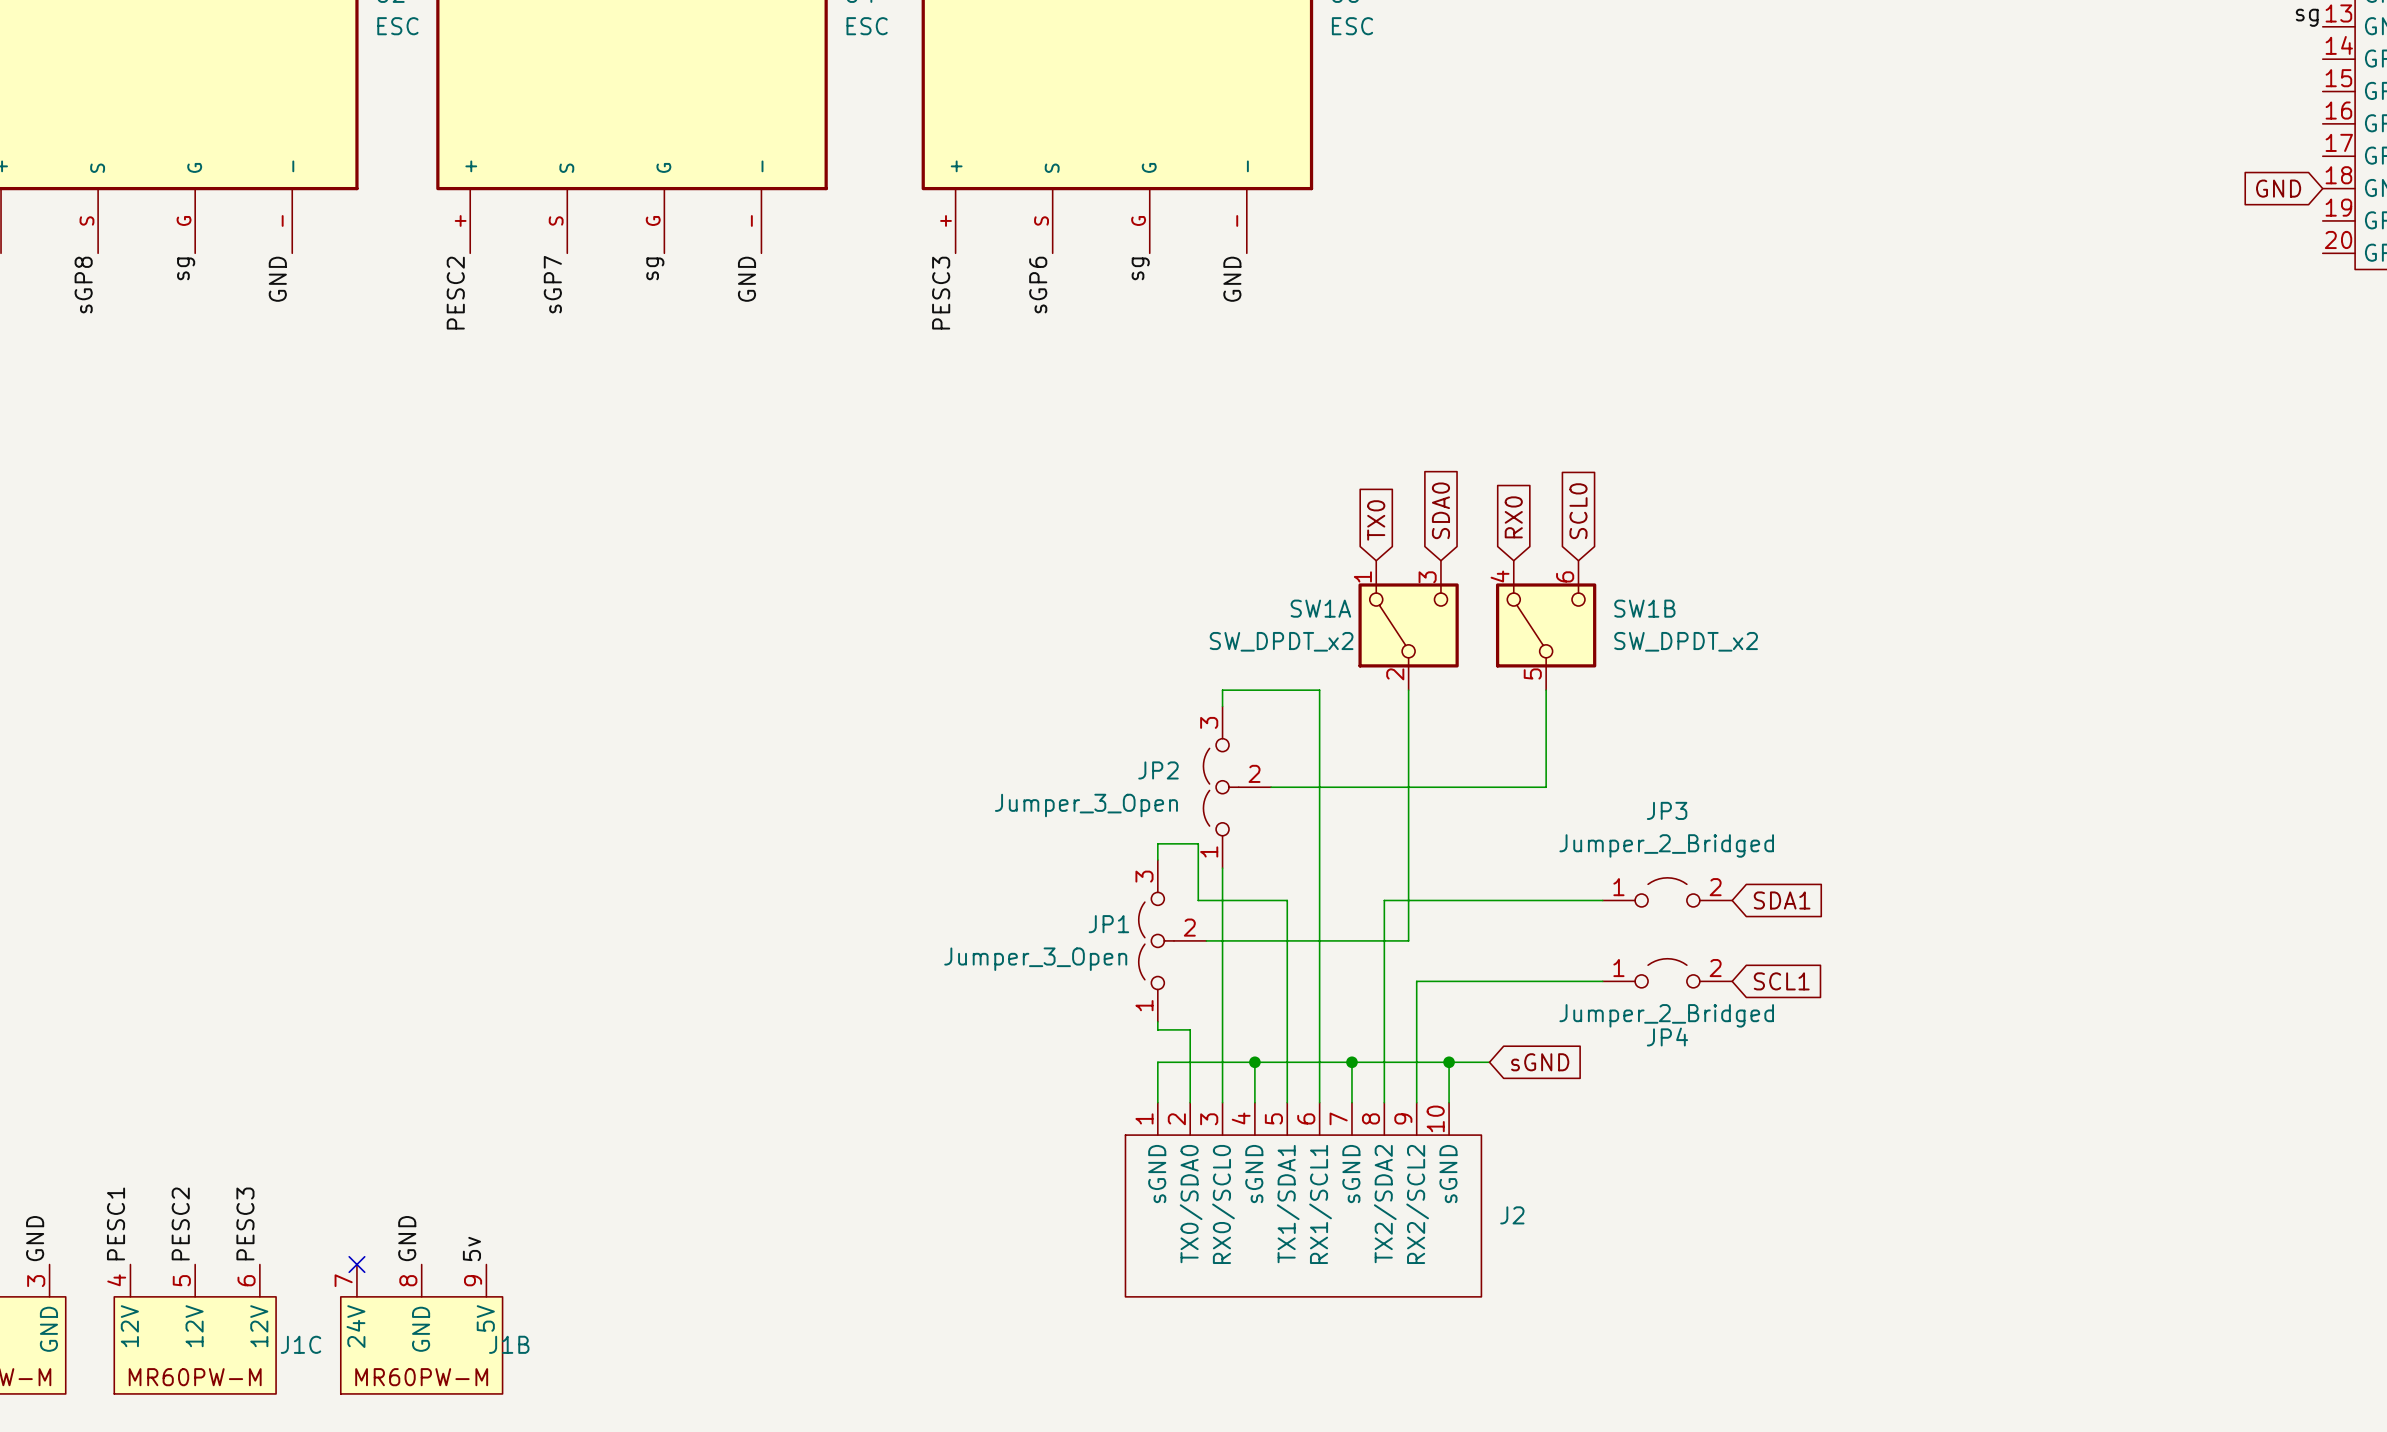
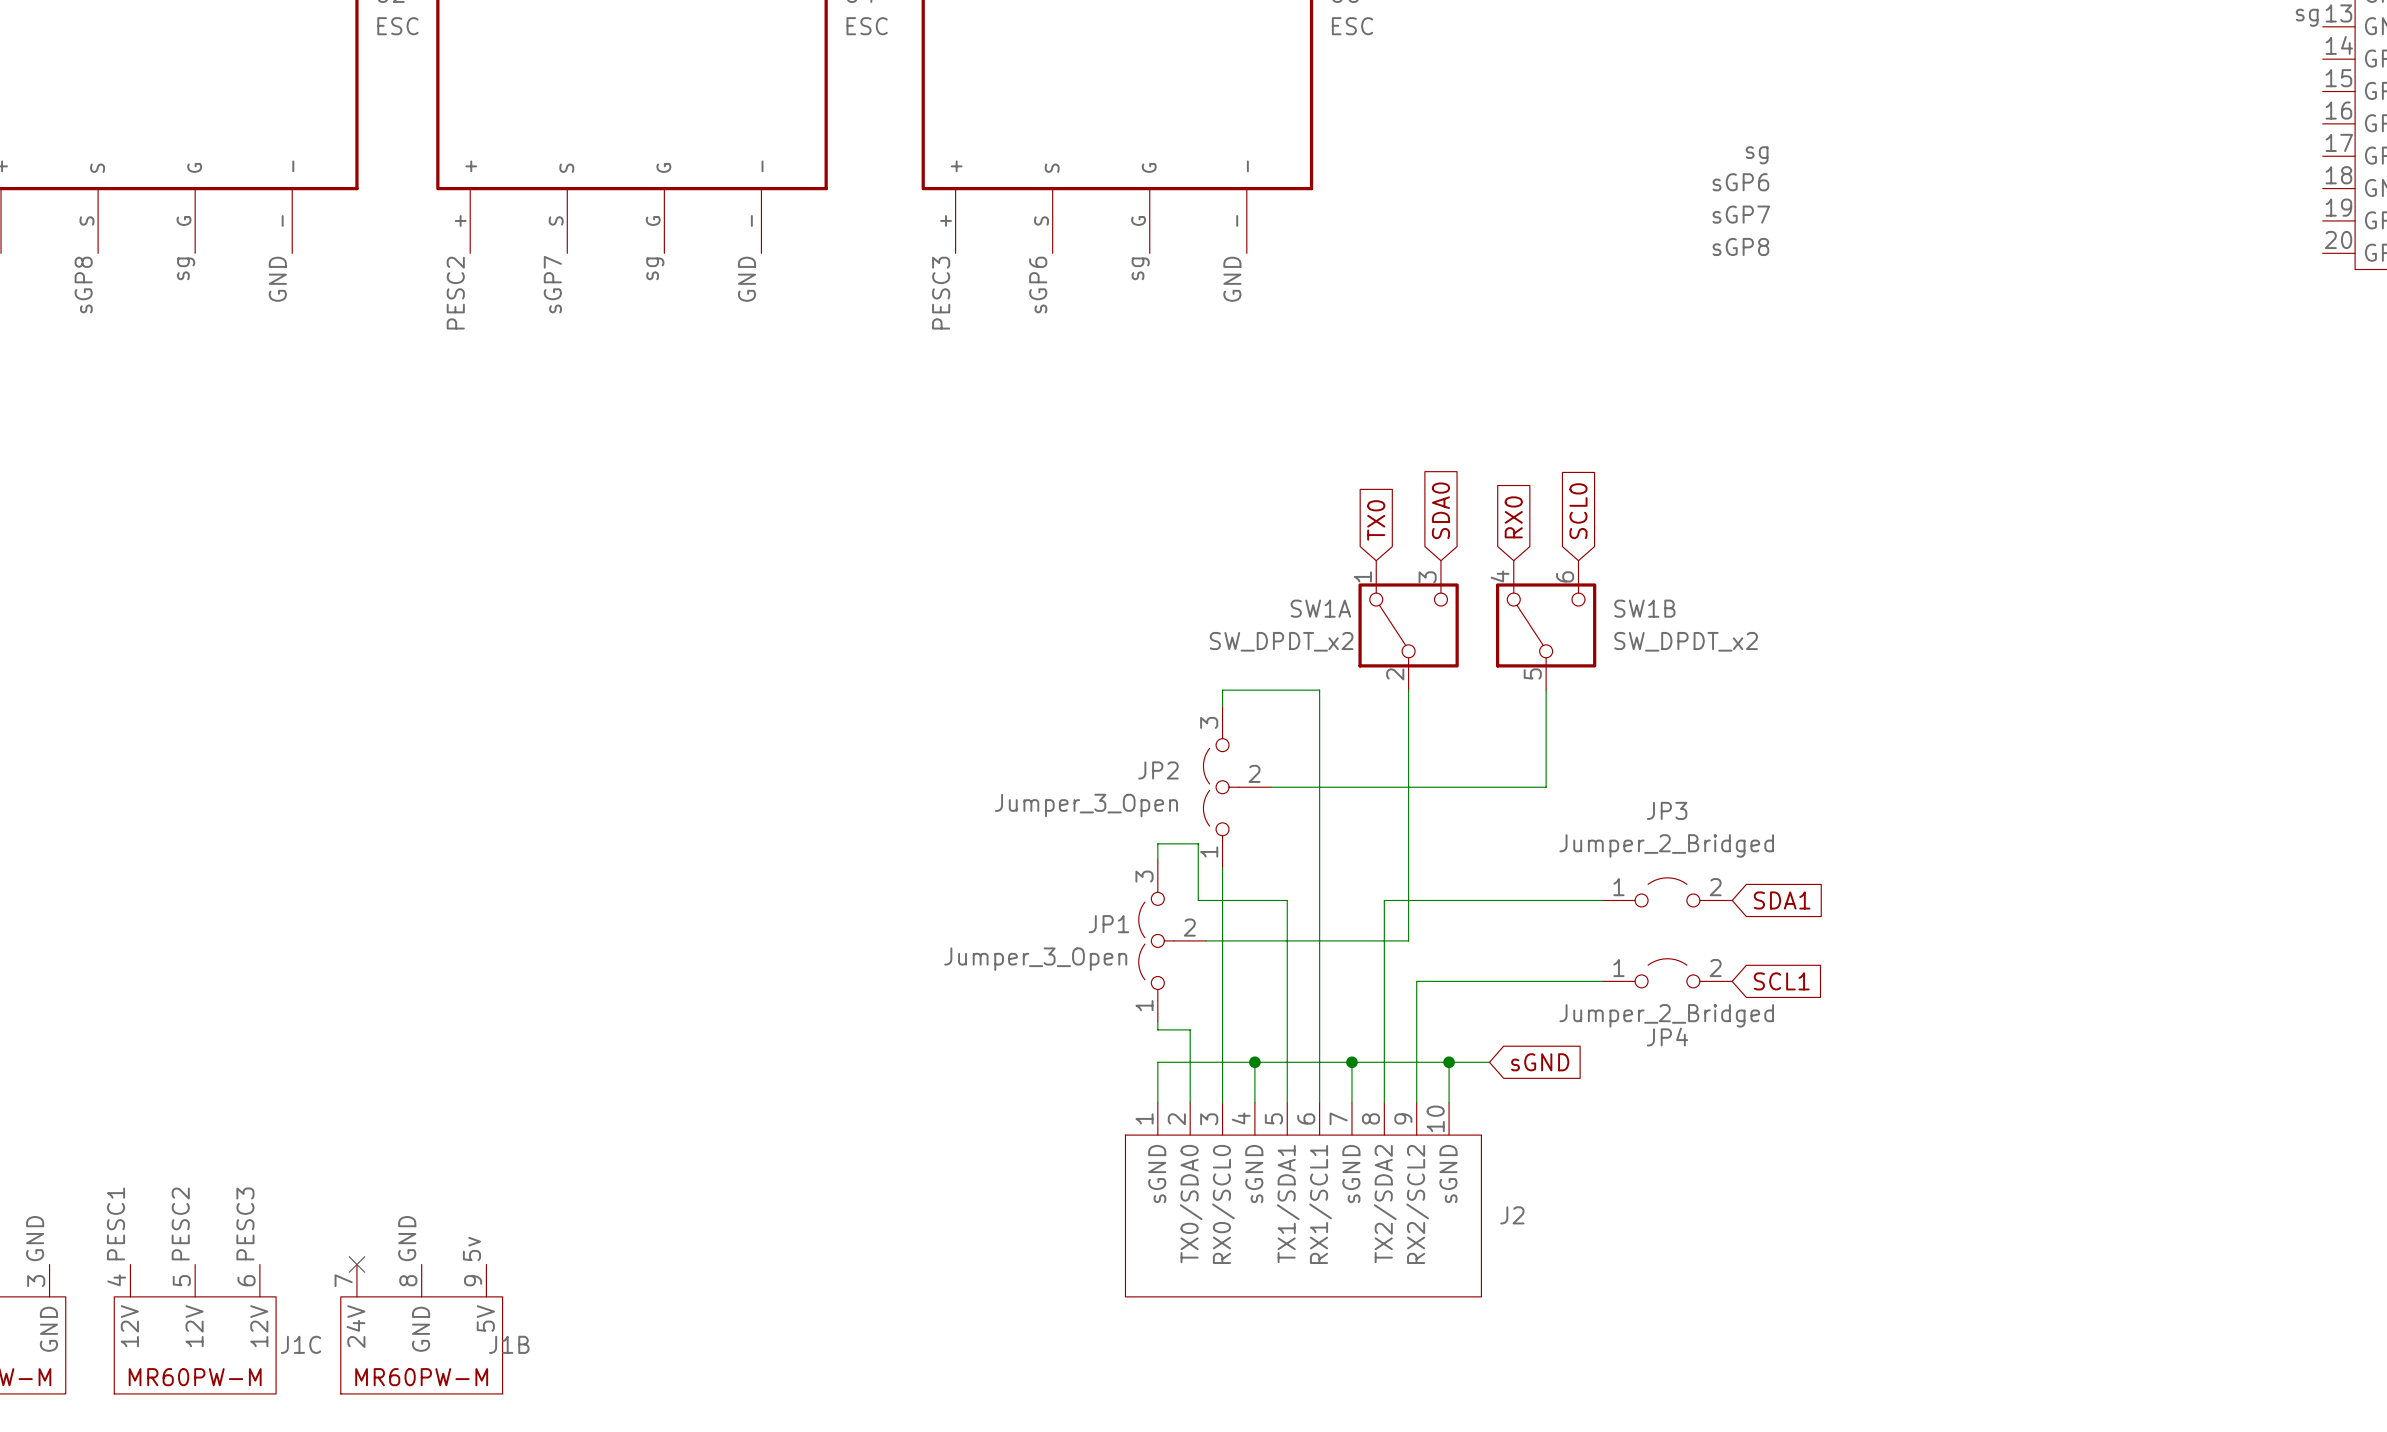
label: none -> sg (1757, 155)
label: none -> sGP6 (1740, 182)
global label: GND (2278, 188) -> none
label: none -> sGP7 (1741, 214)
label: none -> sGP8 (1740, 246)

